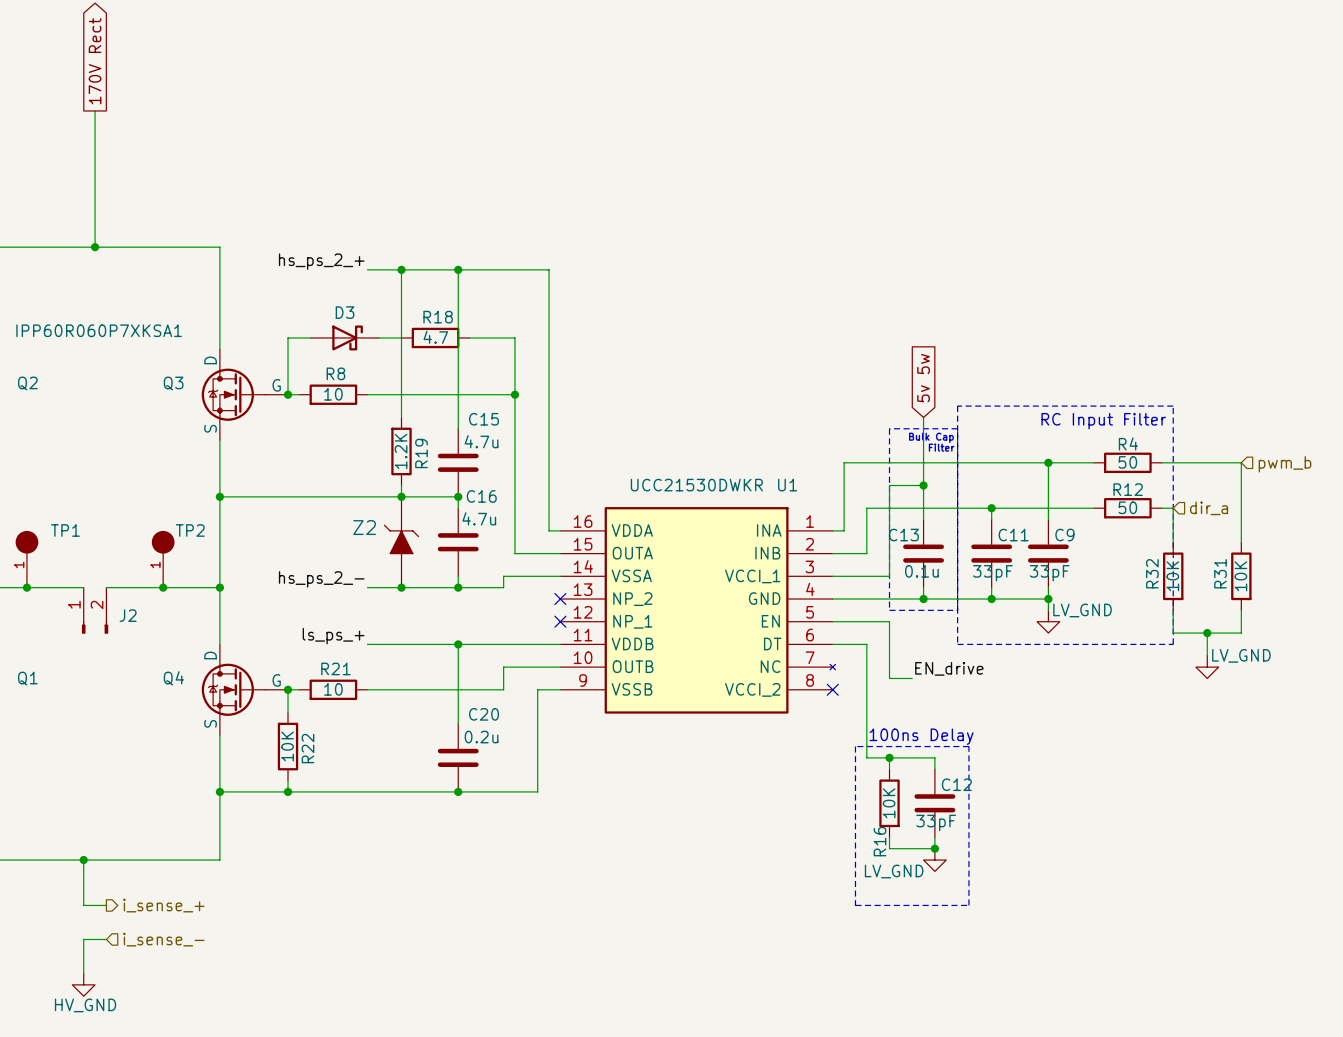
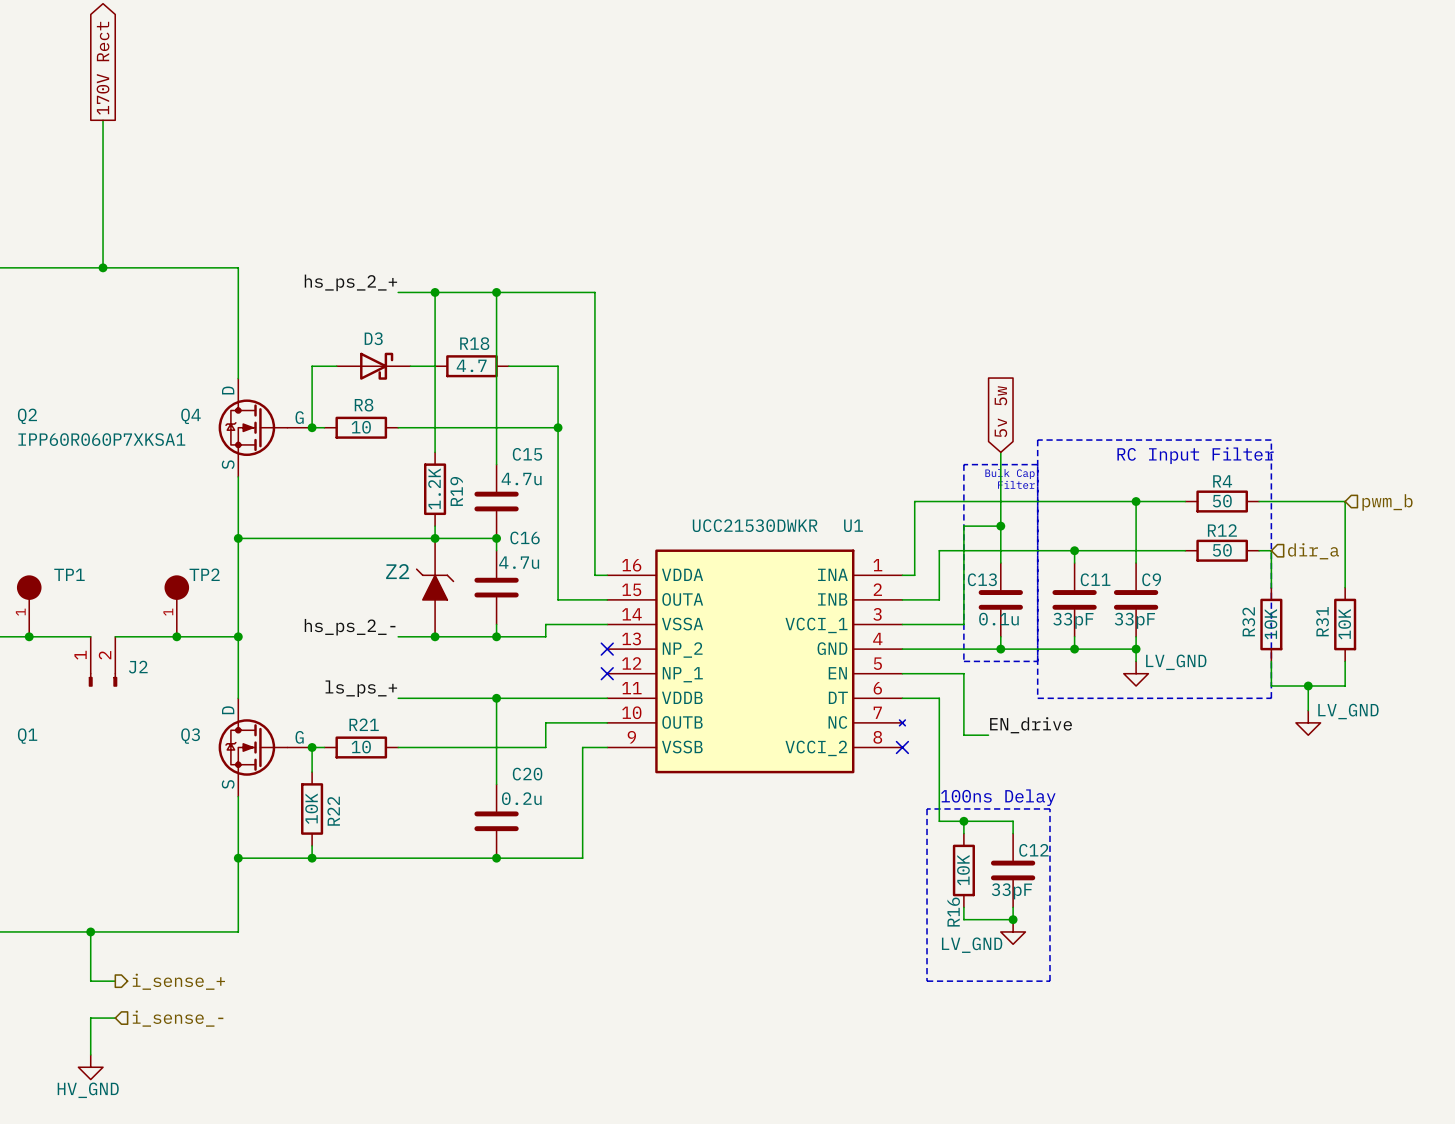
Q2 value position: IPP60R060P7XKSA1 (99, 330) -> IPP60R060P7XKSA1 (101, 439)
Q3 name: Q3 (173, 383) -> Q4 (190, 416)
Q4 name: Q4 (173, 678) -> Q3 (190, 736)

